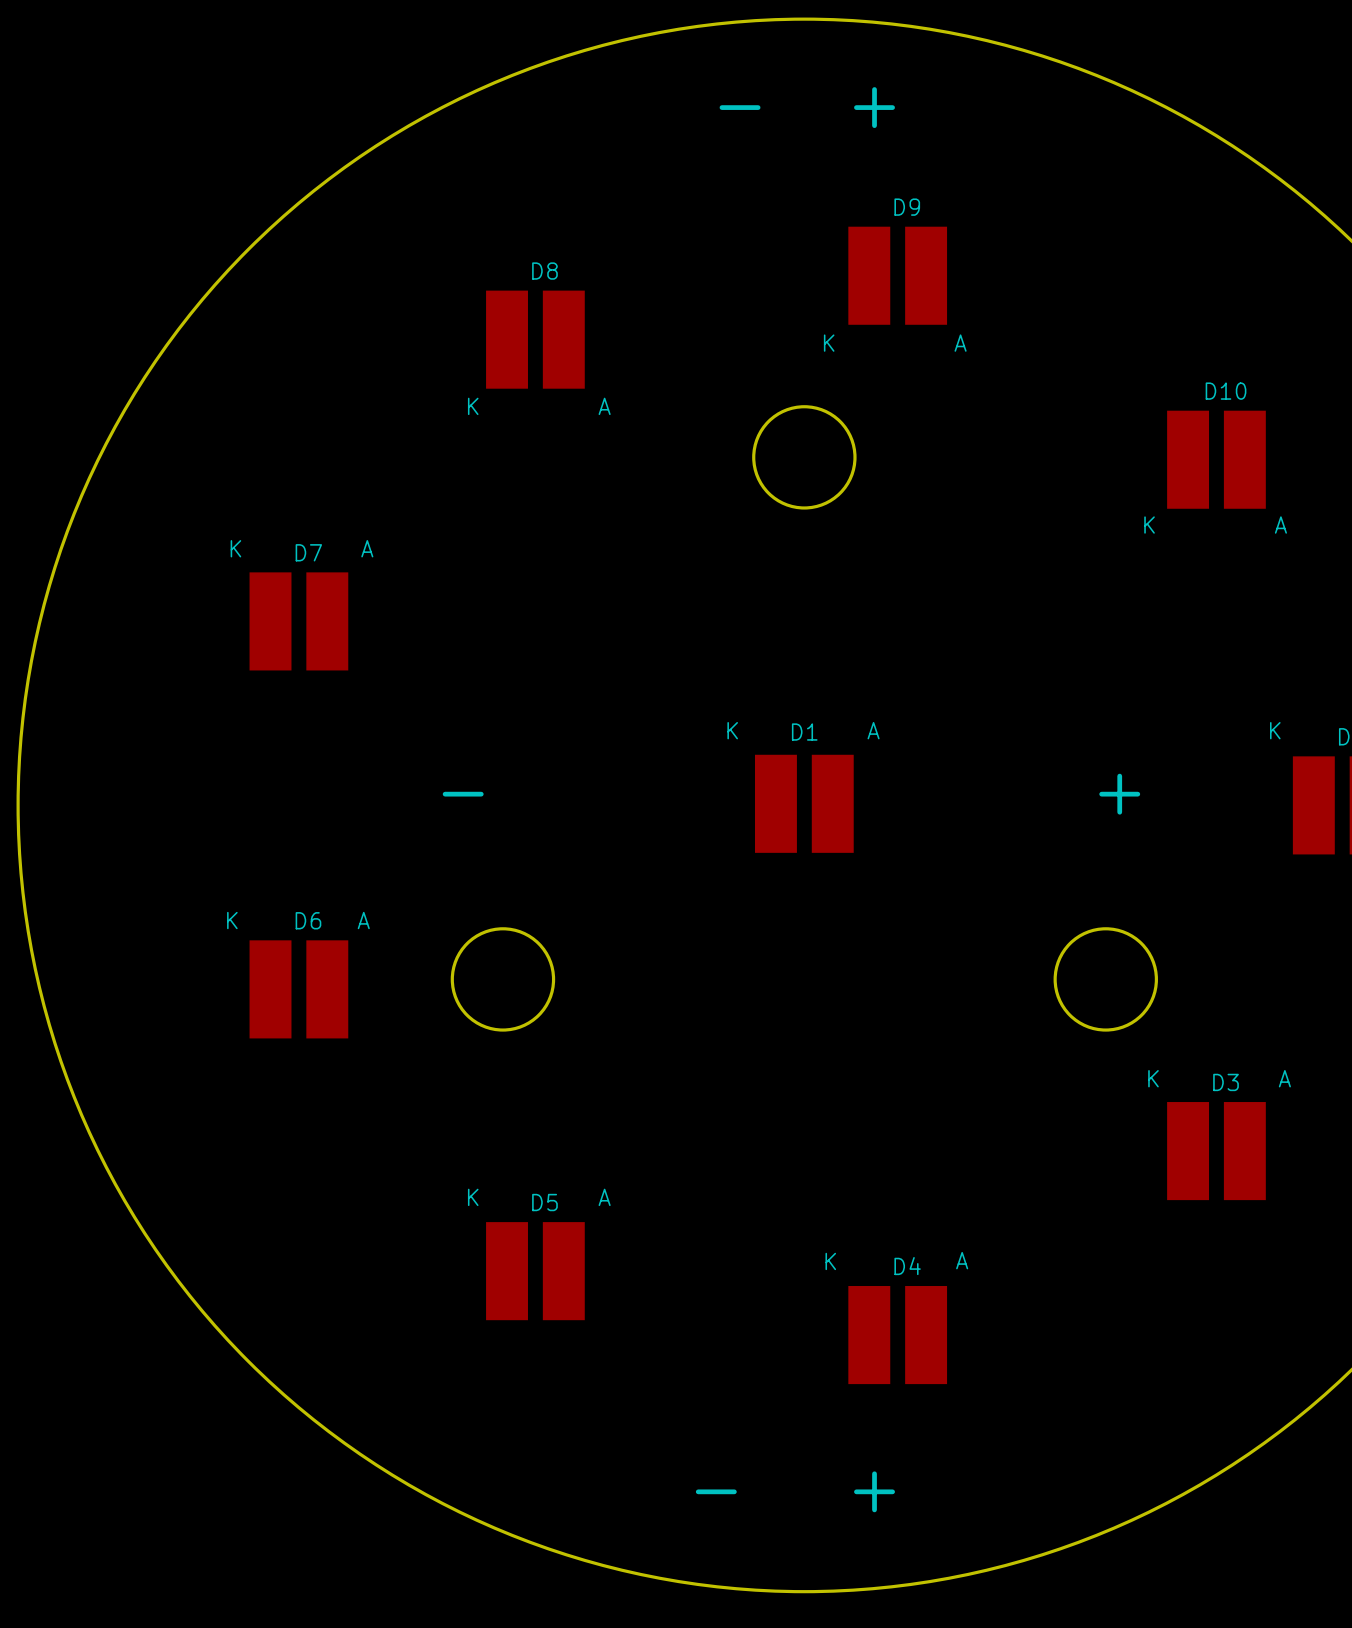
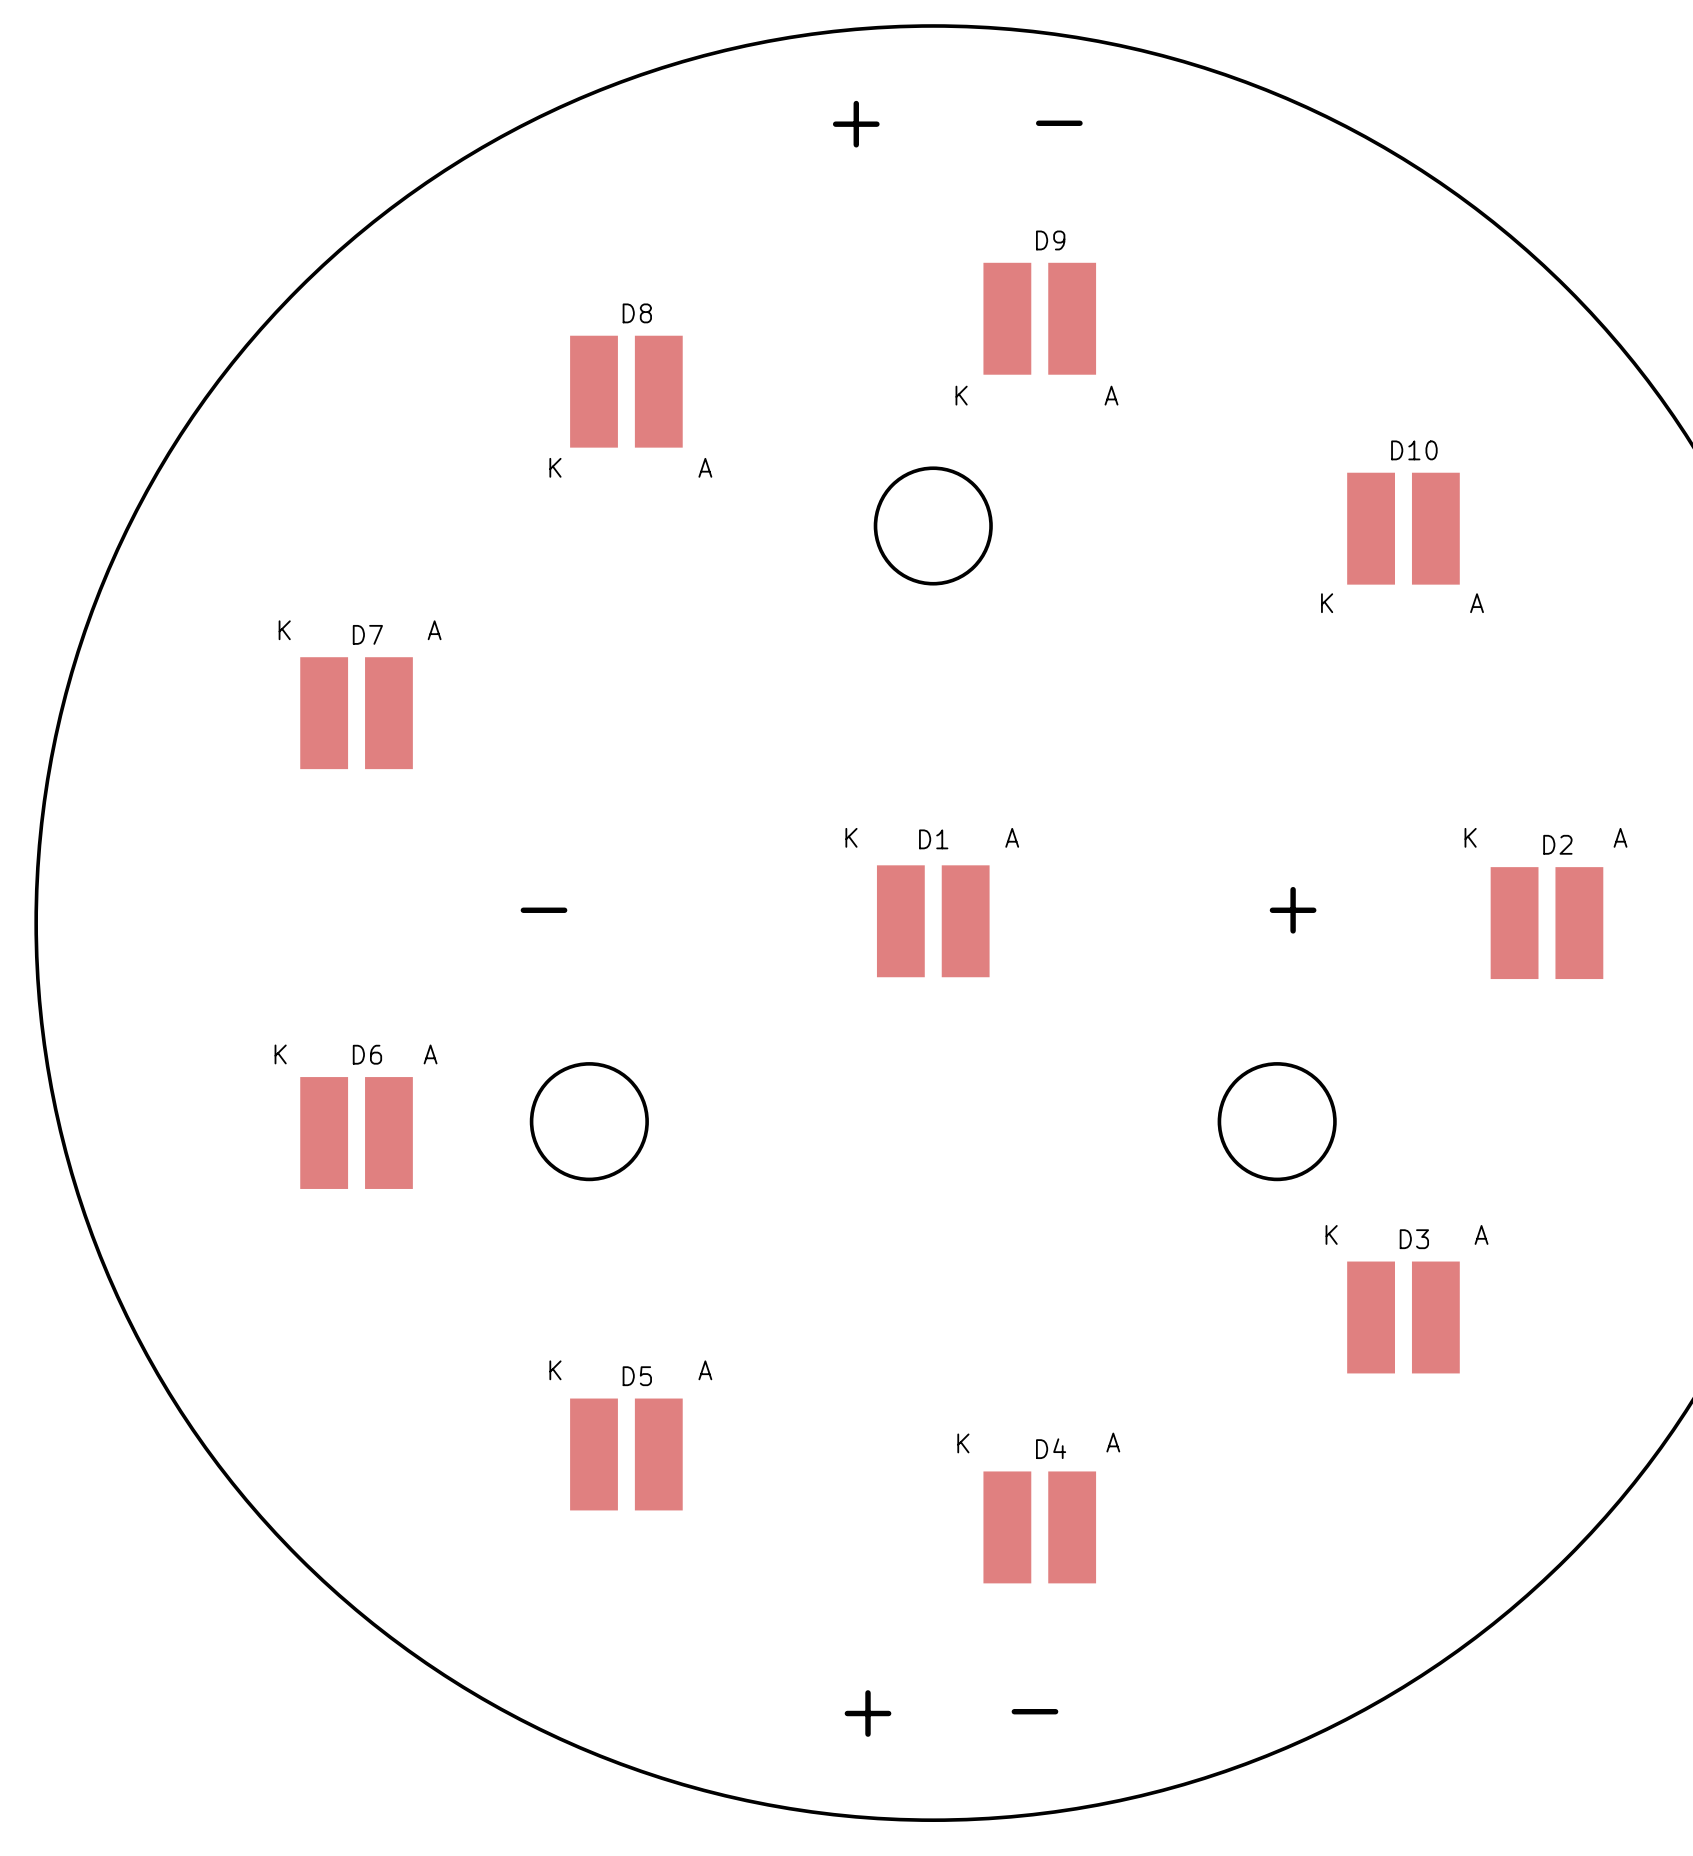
text: none -> - (1059, 123)
text: - (740, 107) -> + (856, 124)
text: + (874, 107) -> none
text position: - (716, 1491) -> - (1034, 1711)
text position: + (874, 1491) -> + (868, 1713)

